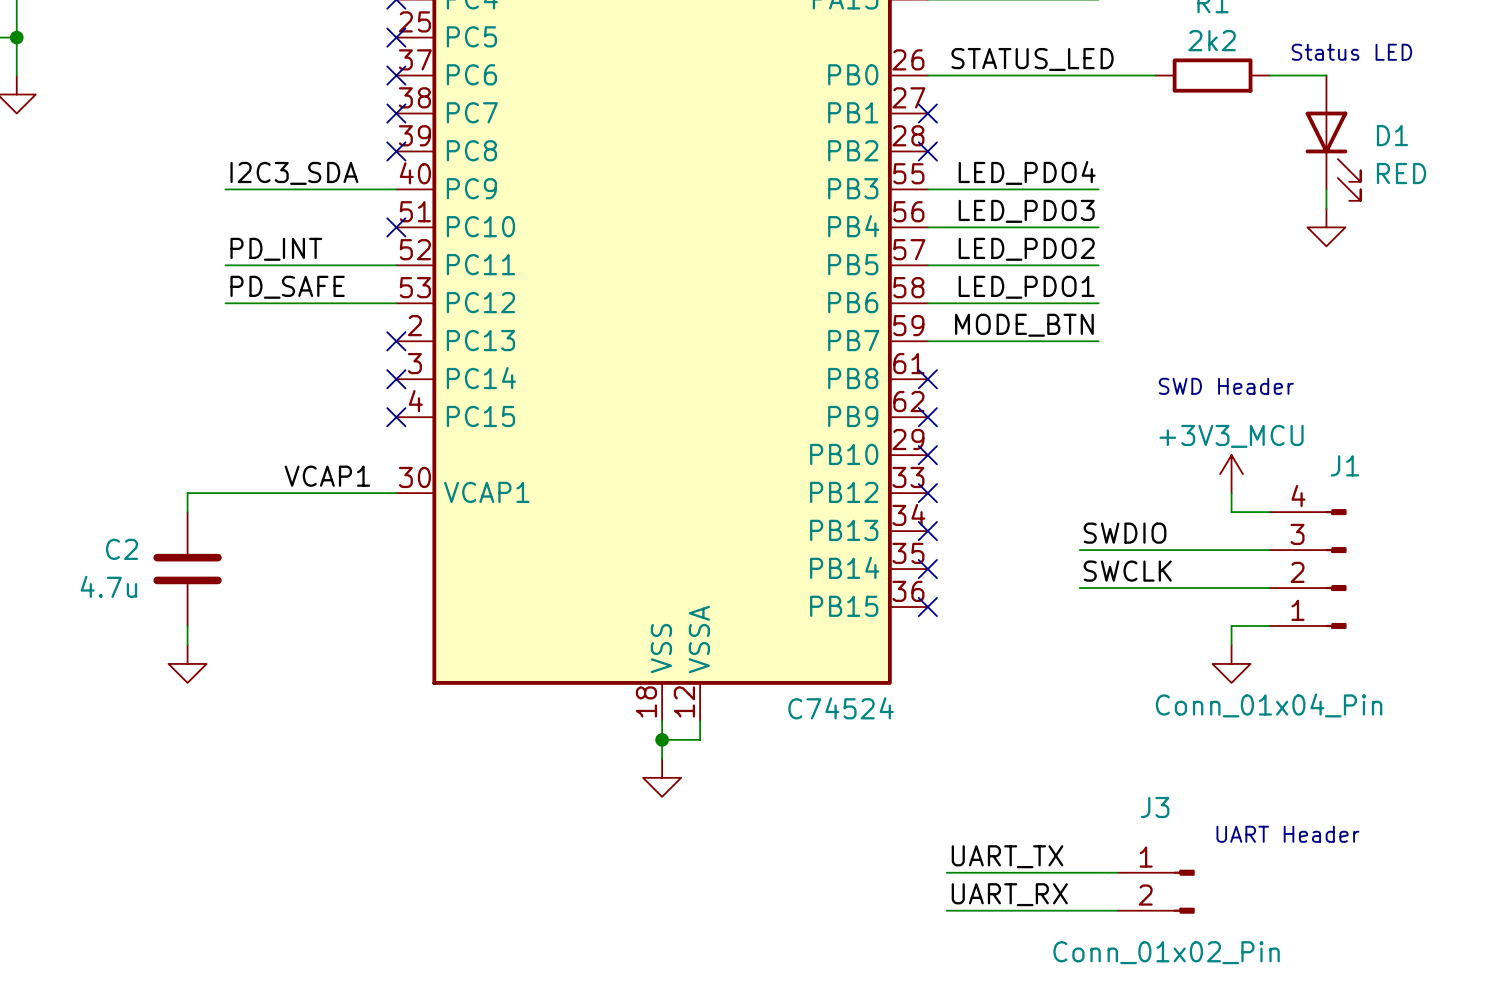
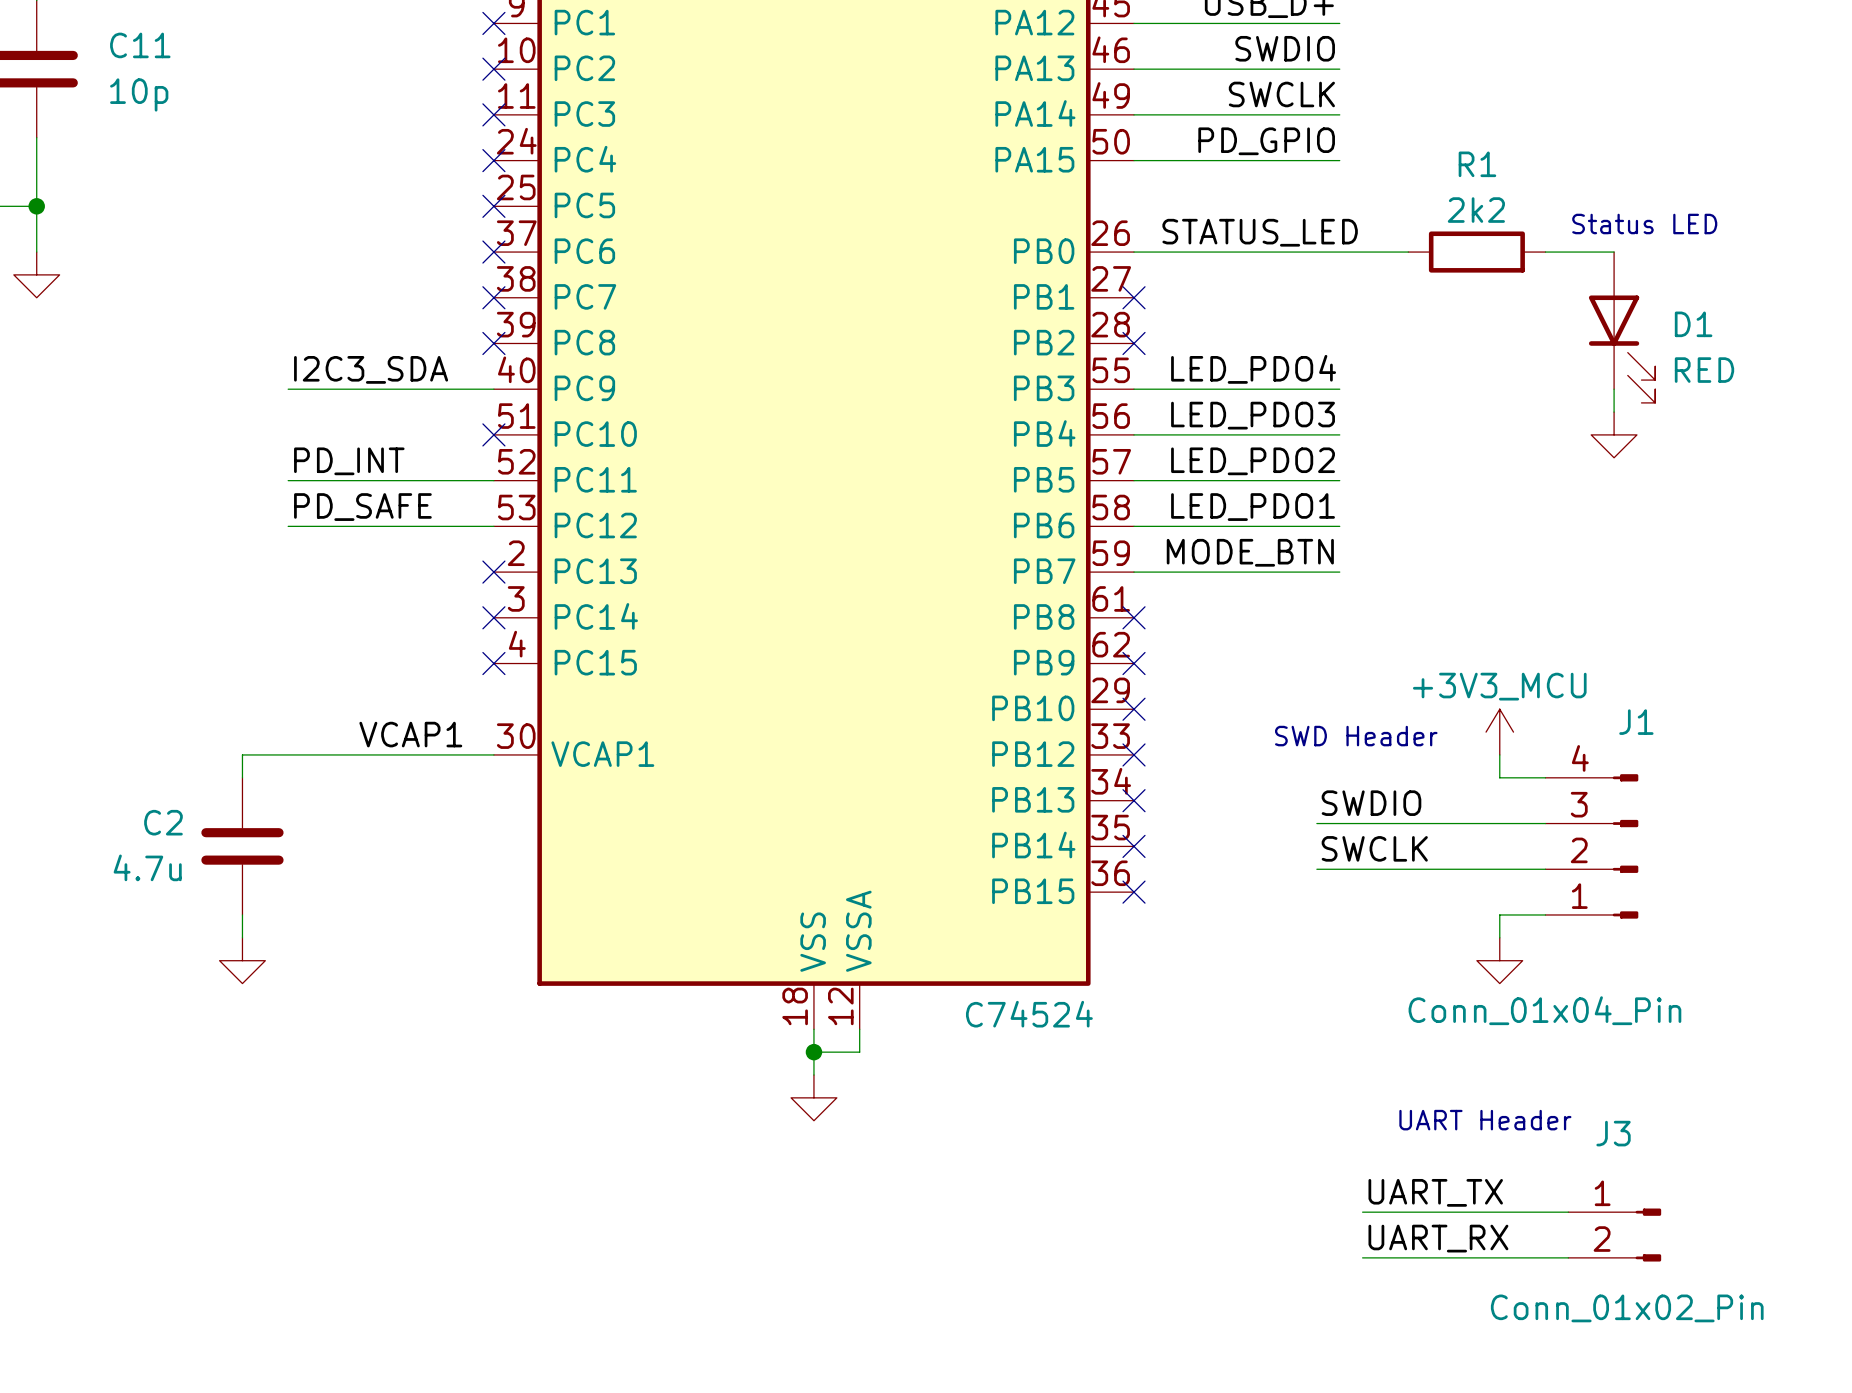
text position: SWD Header (1226, 386) -> SWD Header (1356, 736)
text position: UART Header (1287, 834) -> UART Header (1485, 1120)
label position: UART_TX (1007, 856) -> UART_TX (1435, 1192)
wire: (946, 872) (1117, 872) -> (1568, 1212) (1362, 1212)
J3 position: (1156, 891) -> (1614, 1235)
label position: UART_RX (1009, 894) -> UART_RX (1438, 1238)
wire: (946, 910) (1117, 910) -> (1568, 1257) (1362, 1257)

